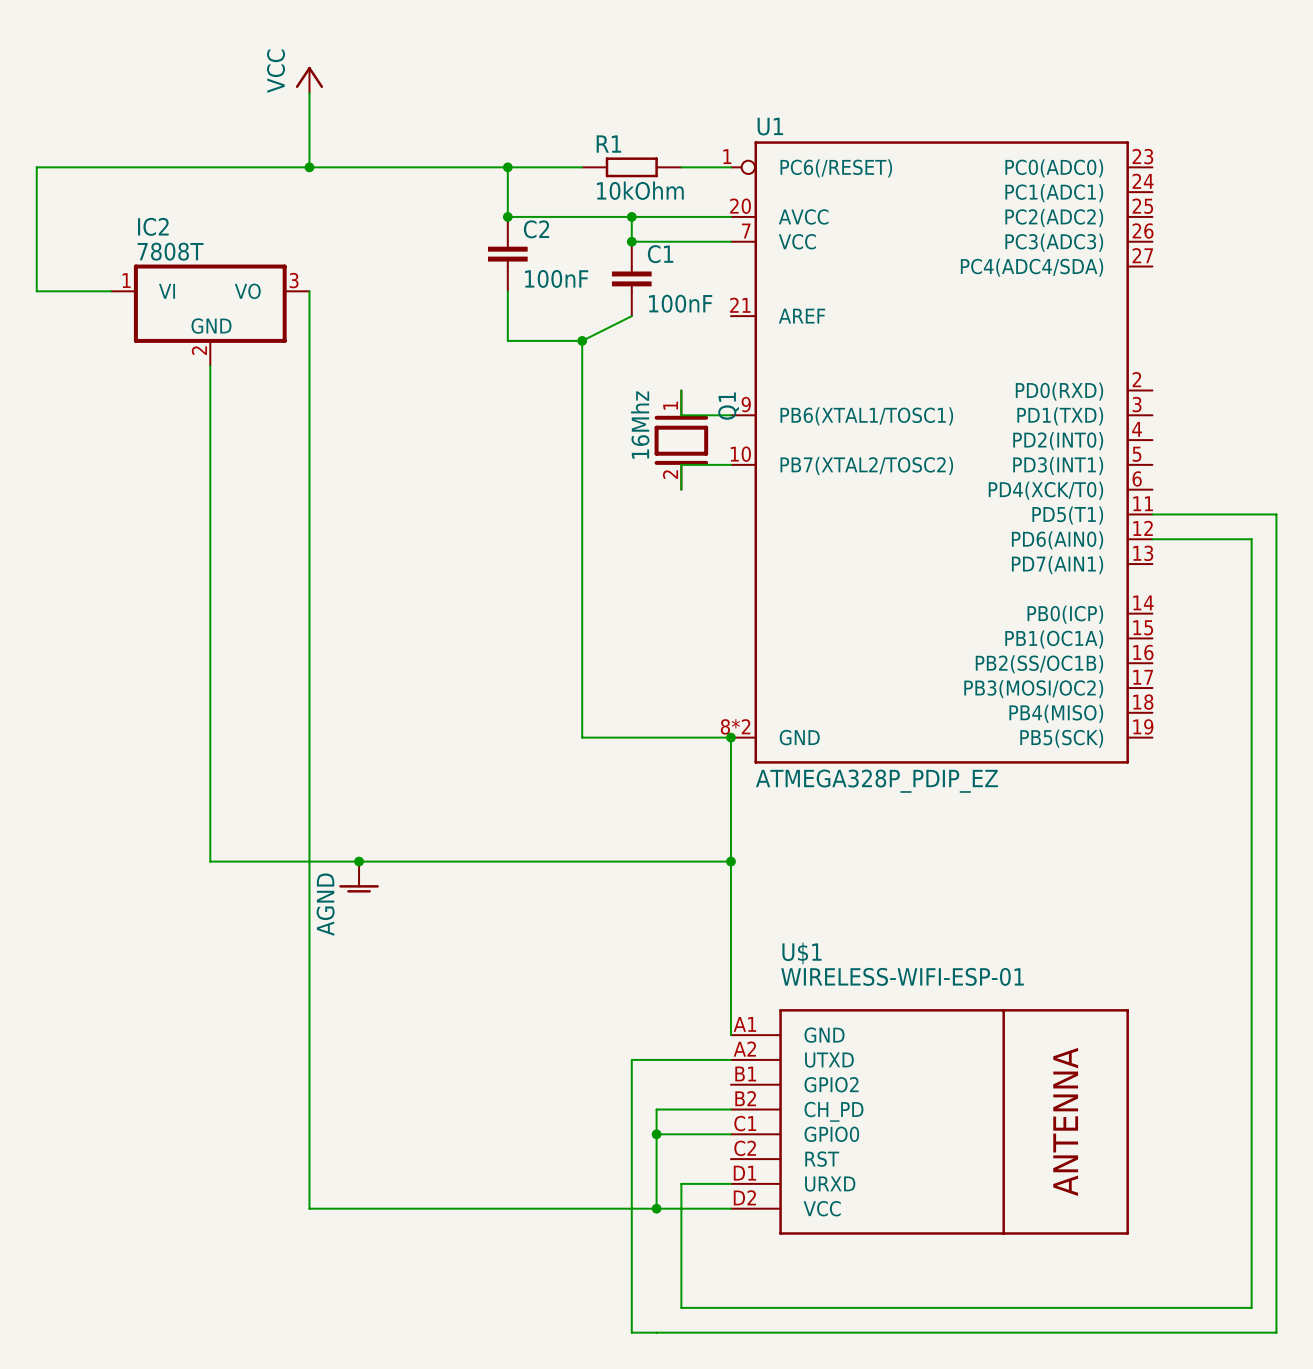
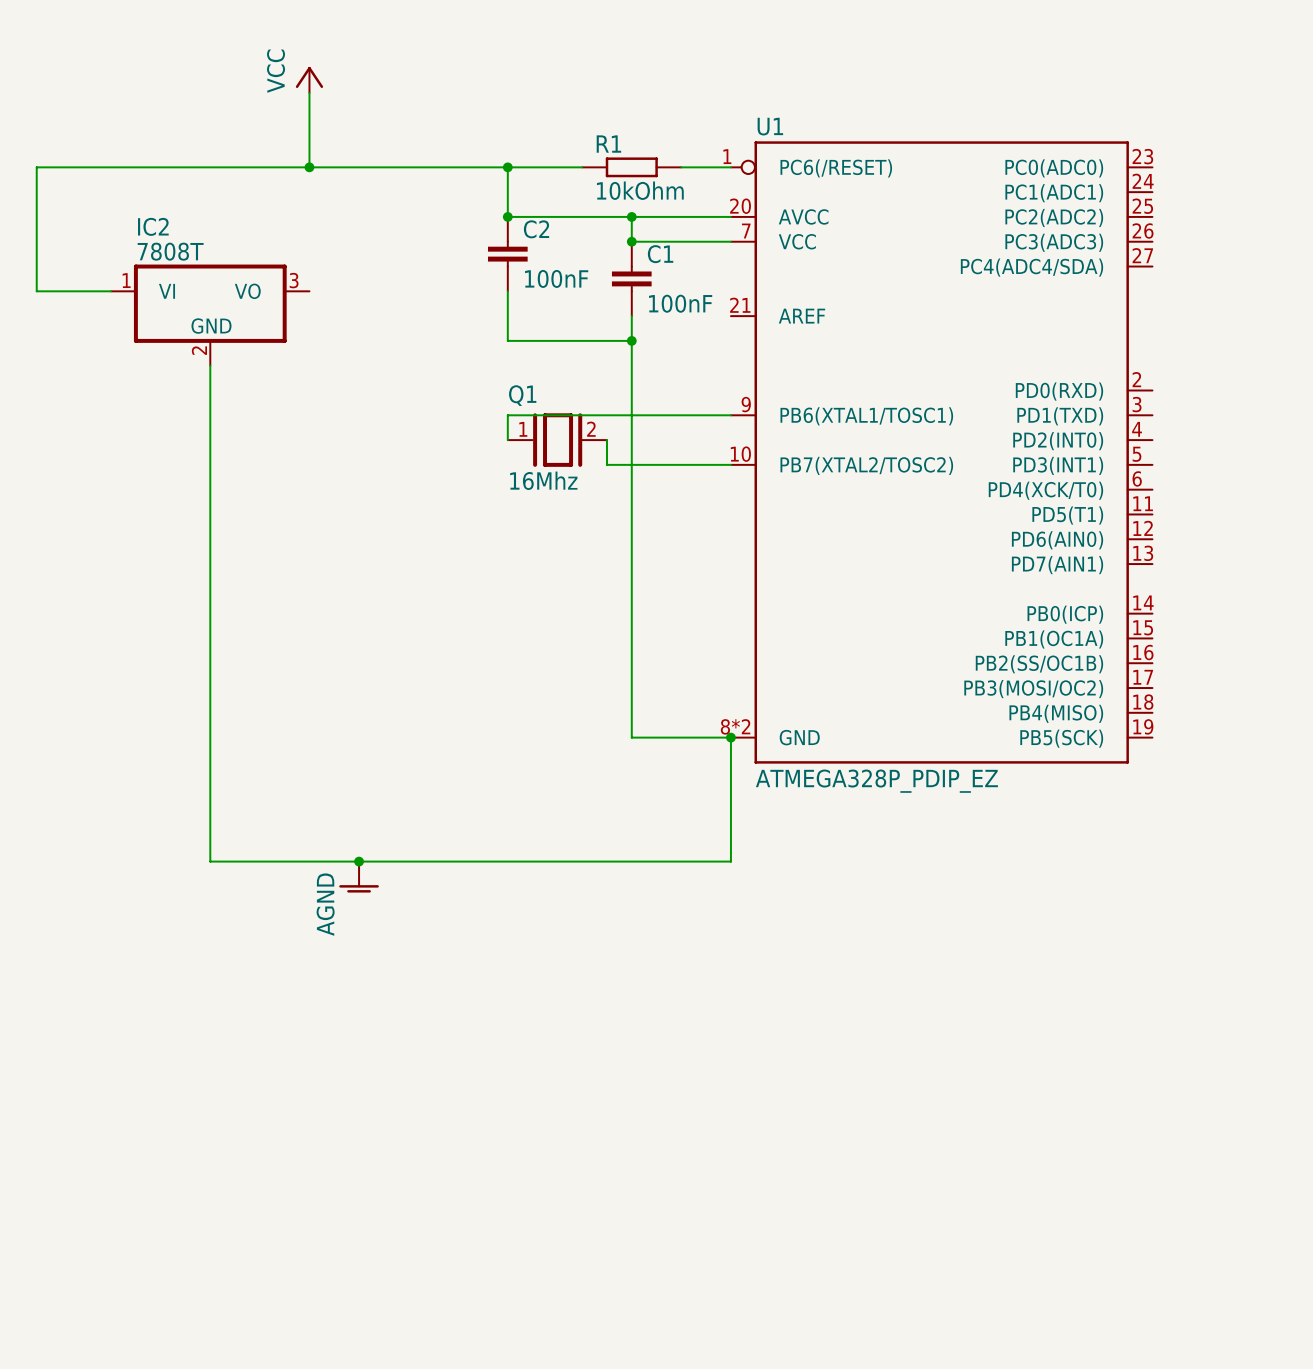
wire: (309, 291) (309, 1208) (730, 1208) -> none
wire: (631, 316) (582, 340) (582, 737) (631, 737) -> (631, 316) (631, 737)
wire: none -> (582, 340) (631, 340)
junction position: (582, 340) -> (631, 340)
wire: (681, 390) (681, 415) -> (507, 440) (507, 415) (681, 415)
Q1 rotation: 0° (681, 440) -> 90° counterclockwise (557, 440)
Q1 position: (681, 440) -> (557, 440)
wire: (681, 464) (681, 489) -> (681, 464) (606, 464) (606, 440)
wire: (1152, 514) (1276, 514) (1276, 1332) (631, 1332) (631, 1059) (730, 1059) -> none
wire: (1152, 539) (1251, 539) (1251, 1307) (681, 1307) (681, 1183) (730, 1183) -> none
wire: (730, 861) (730, 1035) -> none
junction: (730, 861) -> none
wire: (730, 1109) (656, 1109) (656, 1208) -> none
U$1: WIRELESS-WIFI-ESP-01 (929, 1121) -> none
wire: (656, 1134) (730, 1134) -> none
junction: (656, 1134) -> none
junction: (656, 1208) -> none

